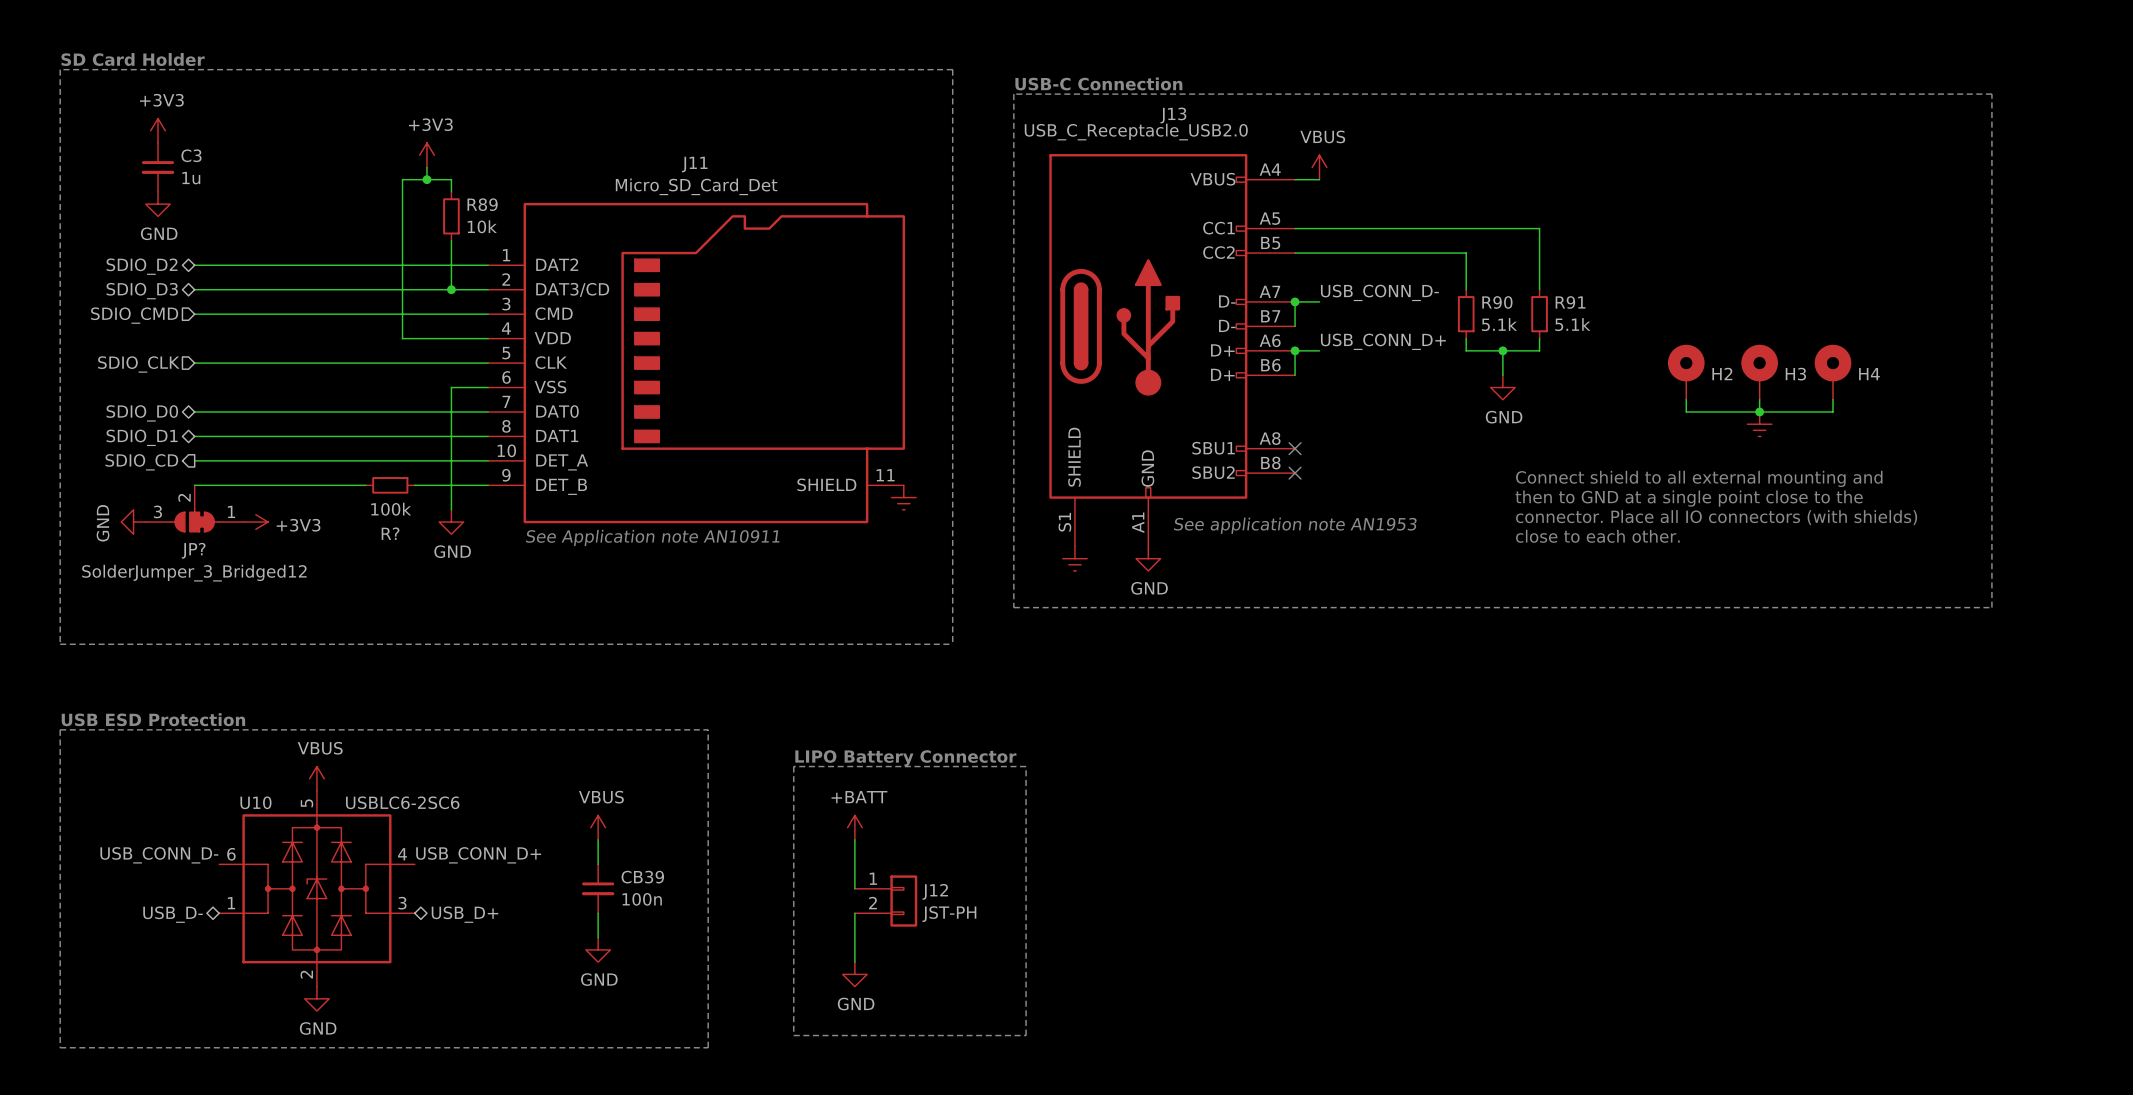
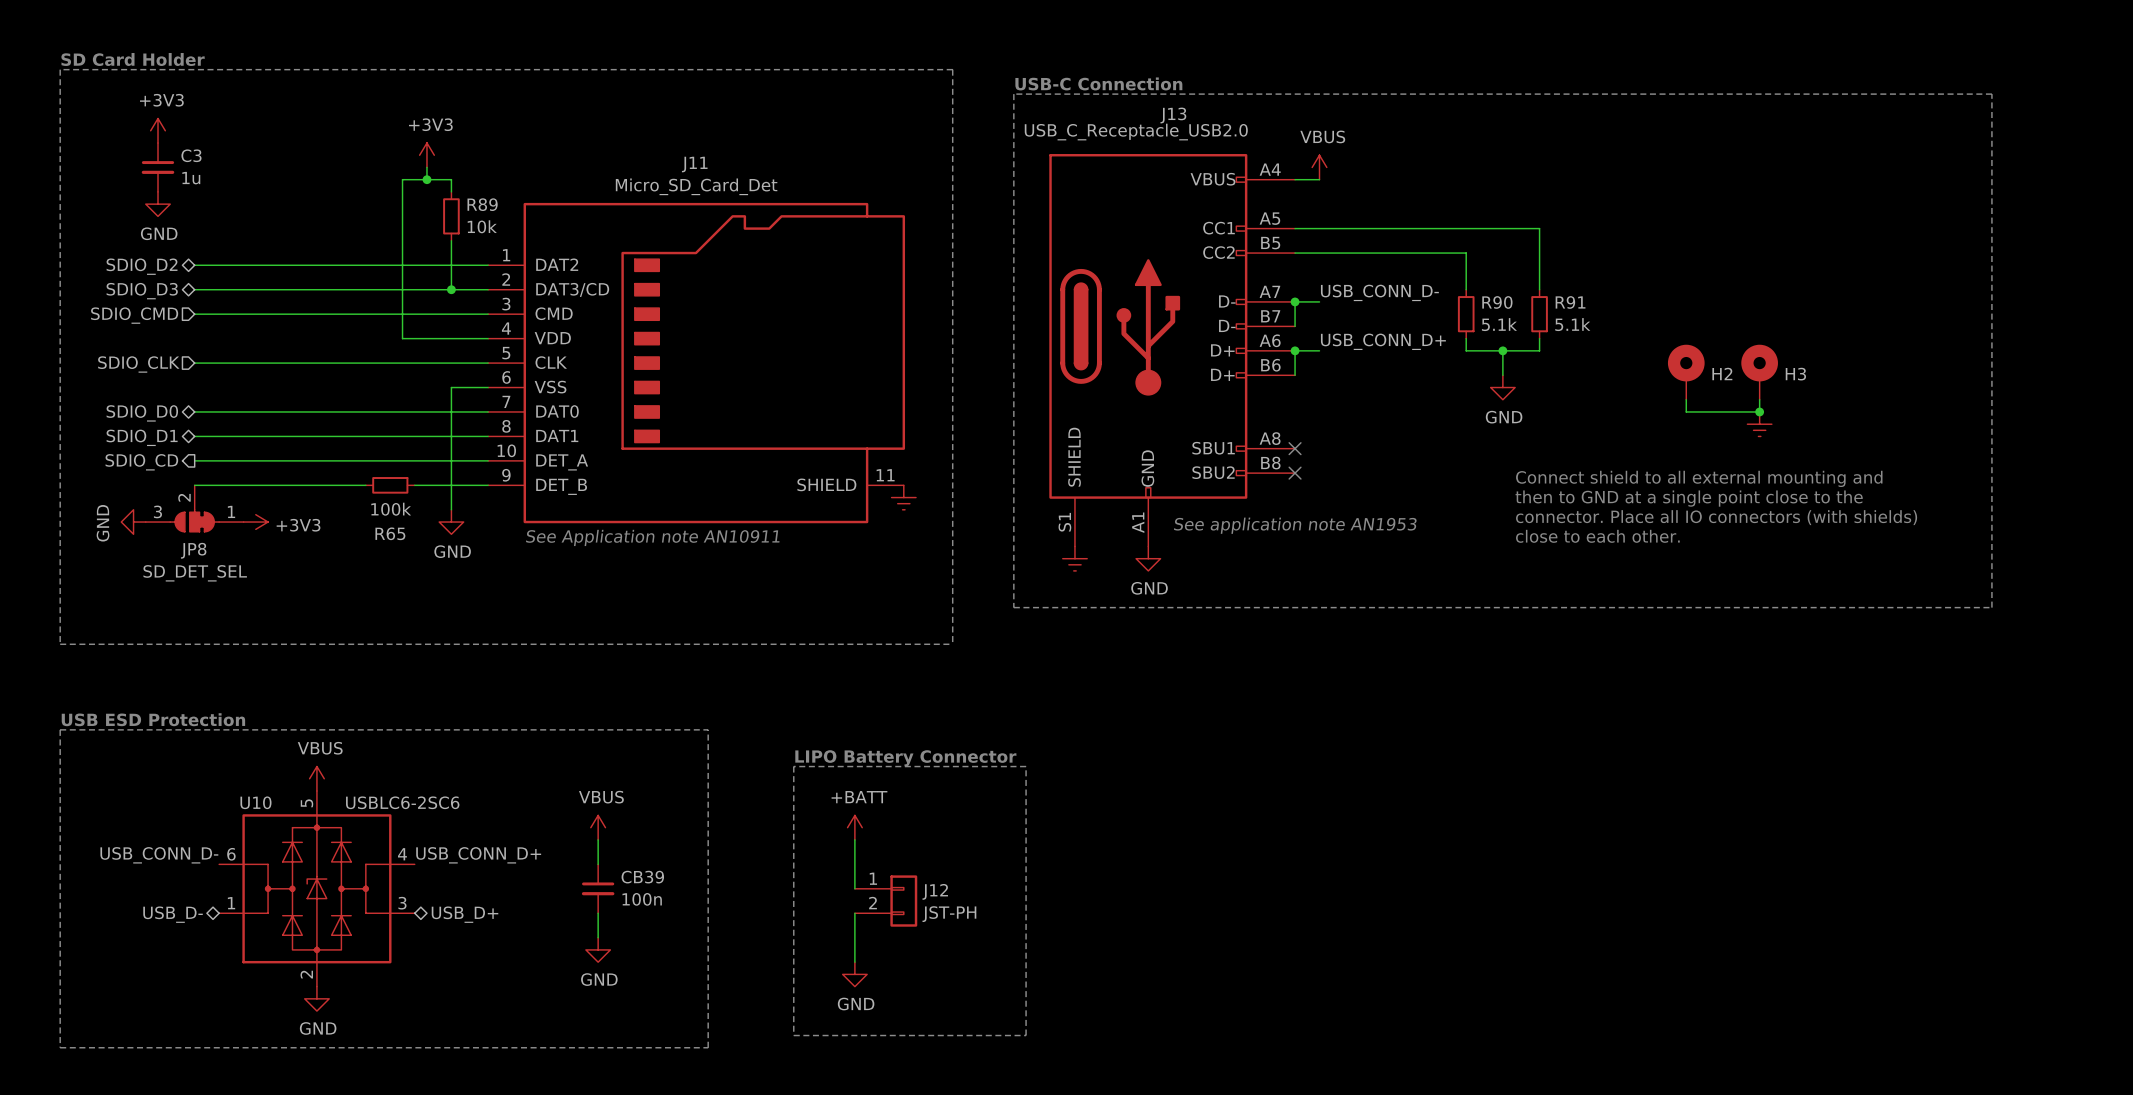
H4: (1833, 372) -> none
wire: (1833, 399) (1833, 411) (1759, 411) -> none
R? name: R? (390, 533) -> R65 (390, 533)
JP? name: JP? (193, 550) -> JP8 (193, 550)
JP? value: SolderJumper_3_Bridged12 (194, 573) -> SD_DET_SEL (195, 573)

